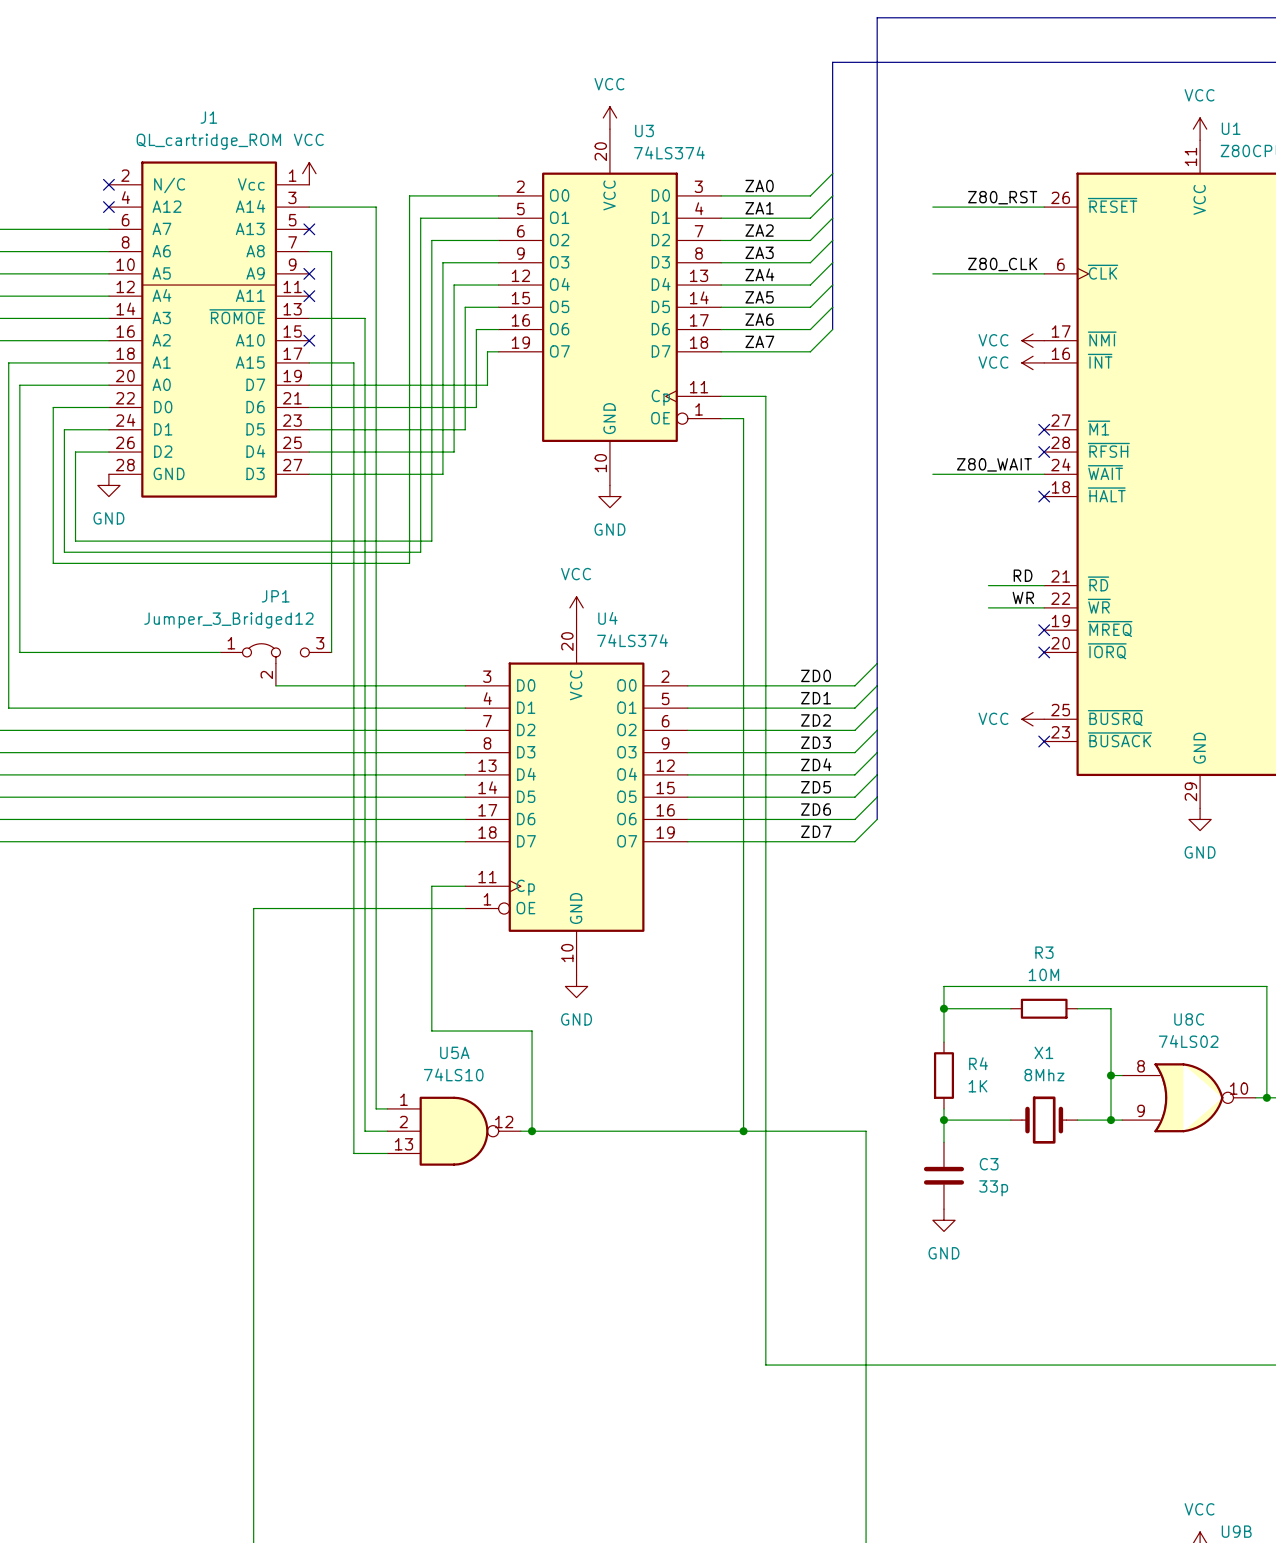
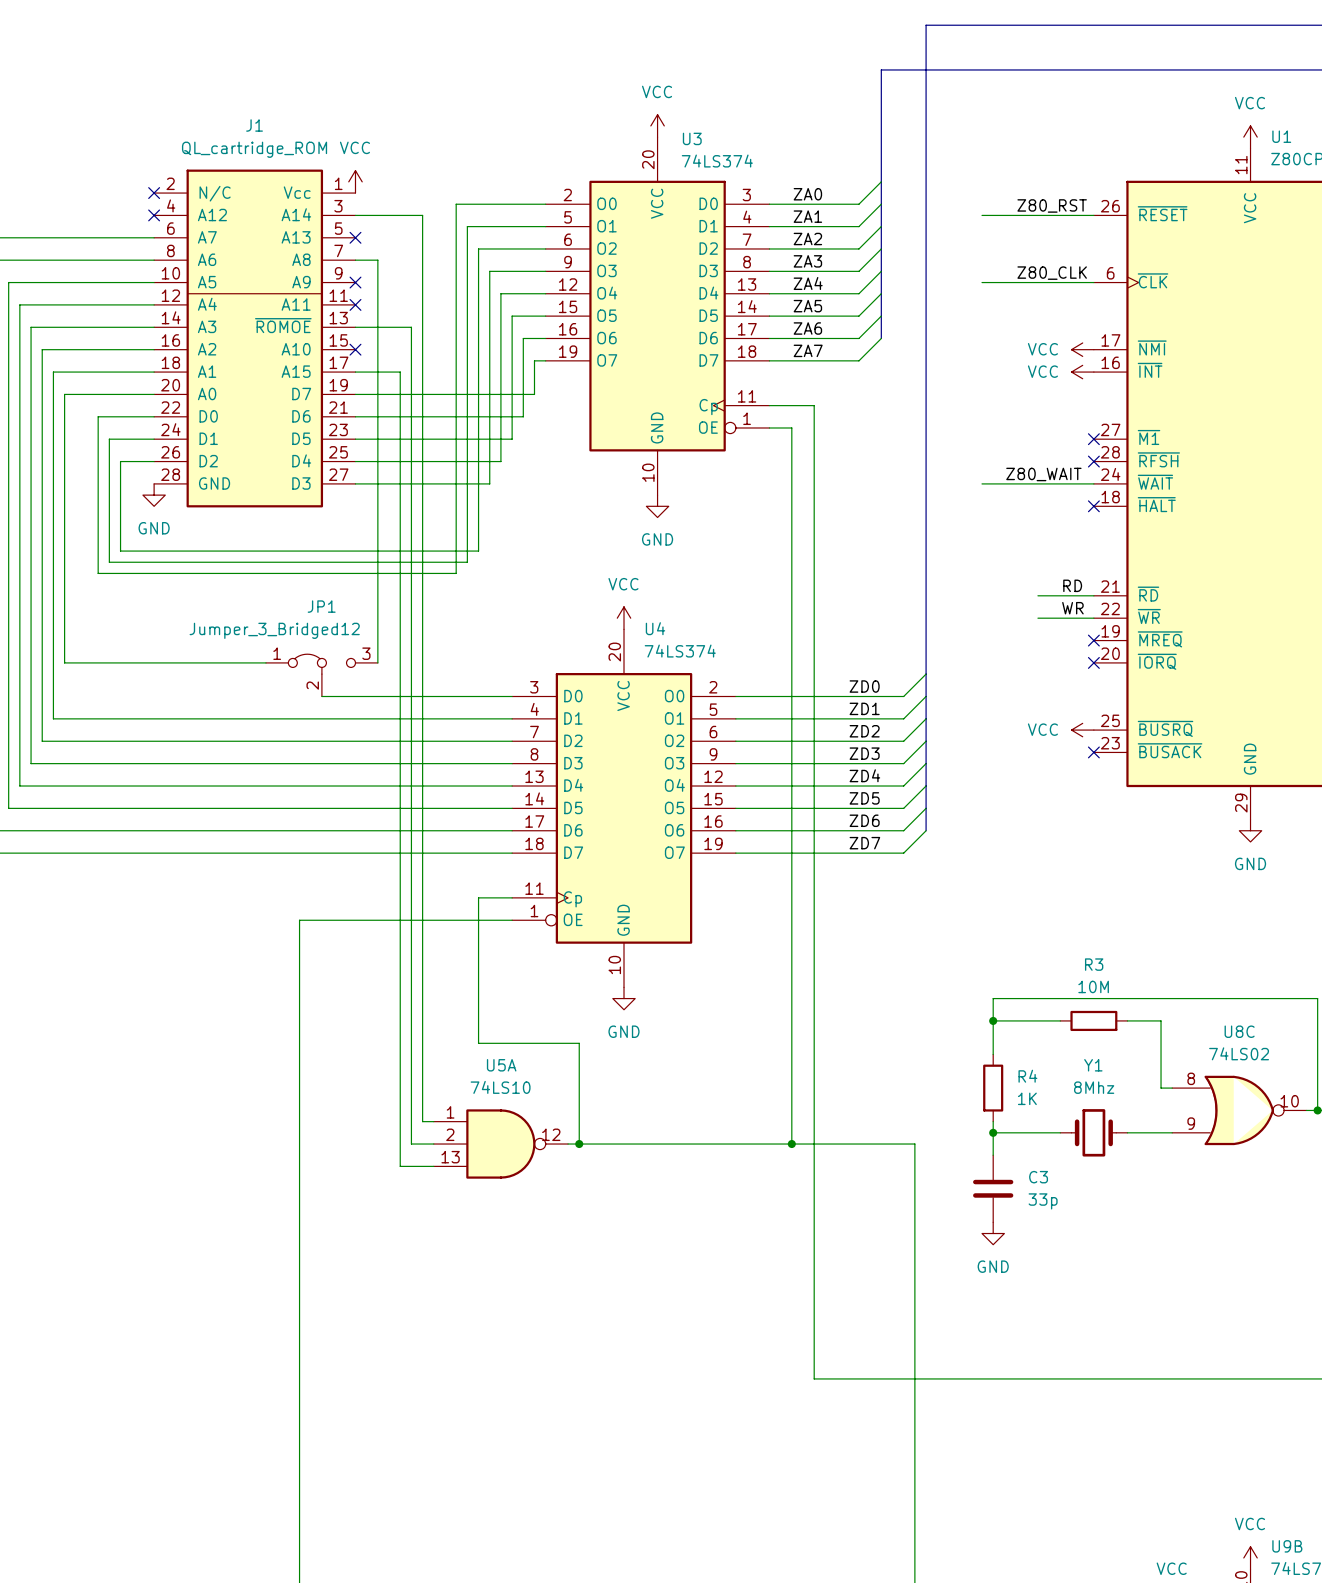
X1 name: X1 (1043, 1052) -> Y1 (1093, 1065)
wire: (1111, 1075) (1111, 1120) -> none
junction: (1111, 1075) -> none
junction: (1111, 1120) -> none

